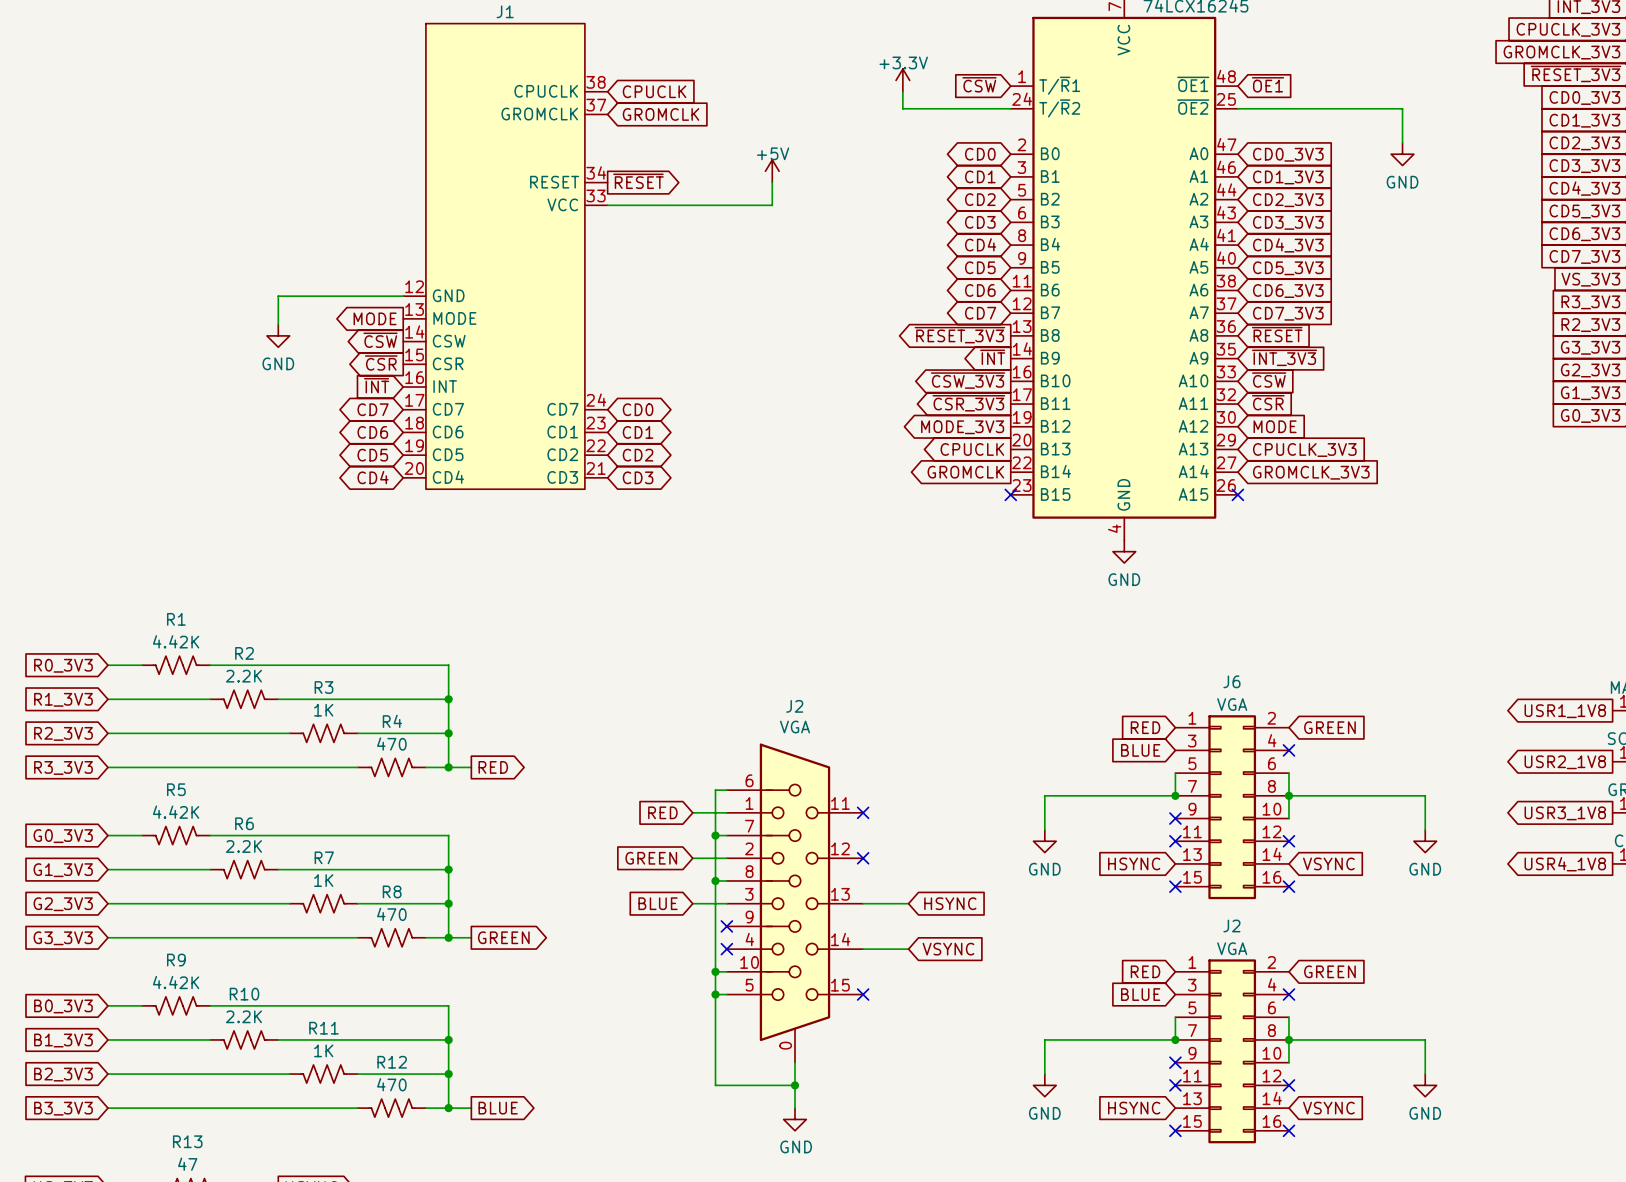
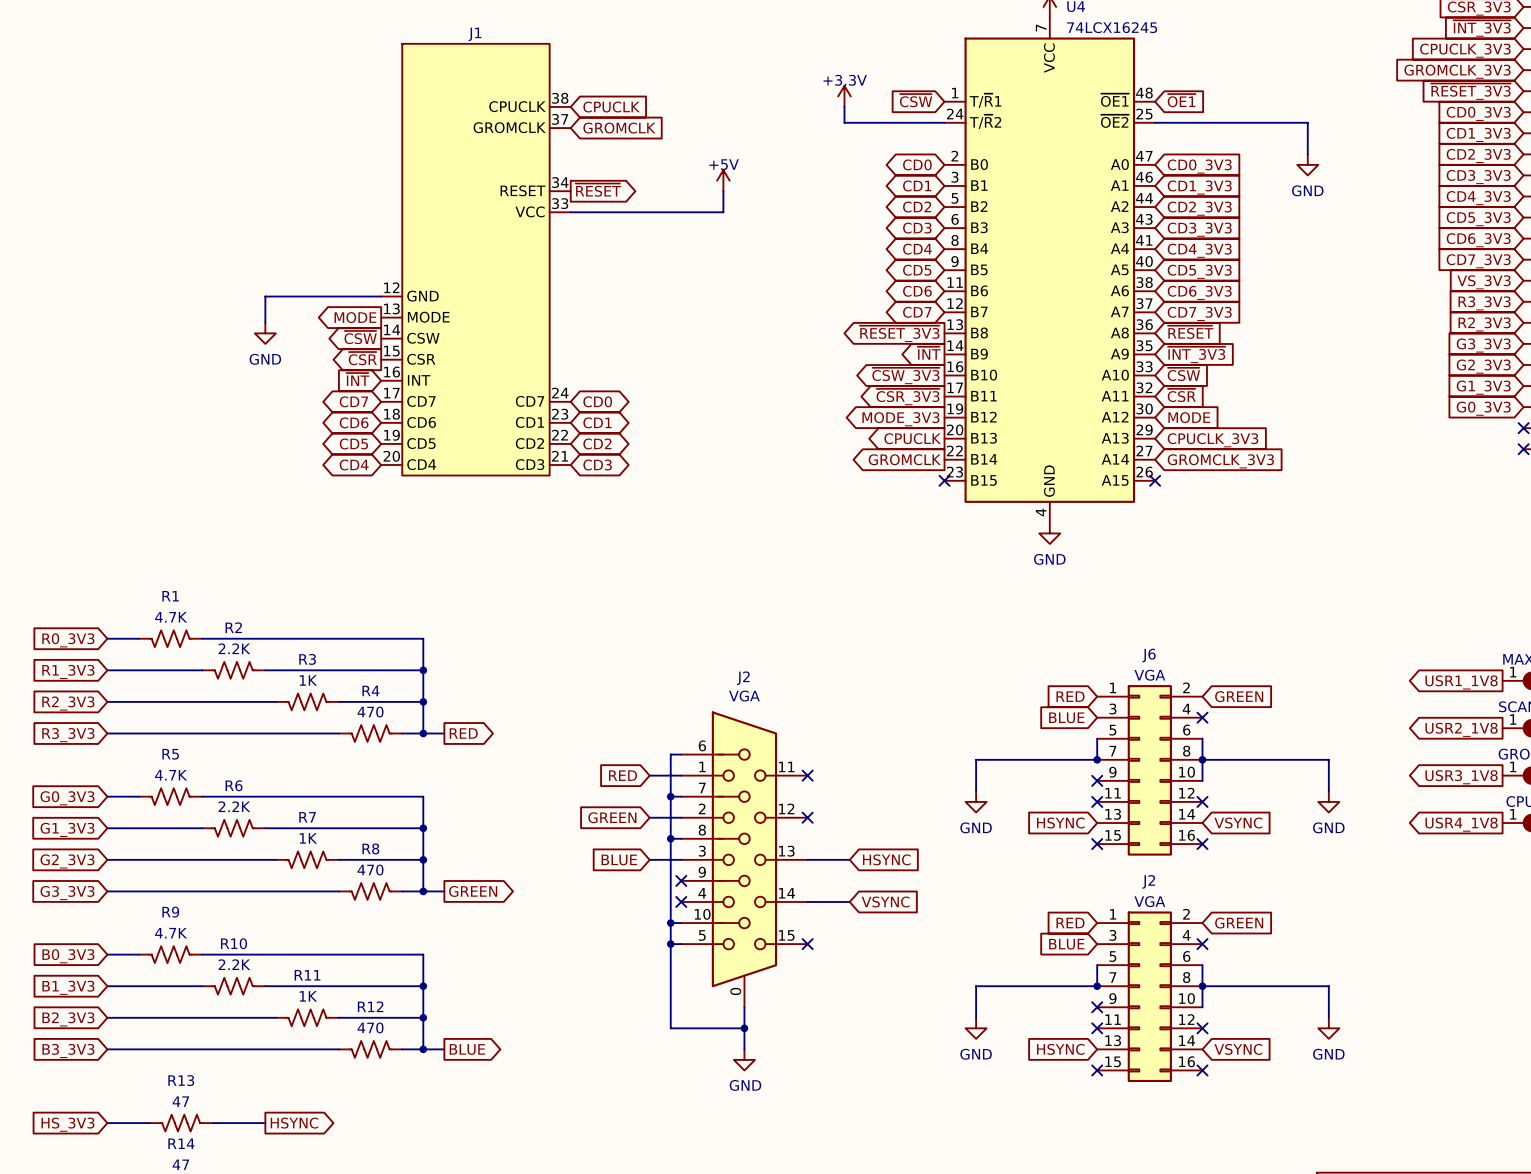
R1 value: 4.42K (176, 641) -> 4.7K (171, 617)
R5 value: 4.42K (176, 812) -> 4.7K (171, 775)
R9 value: 4.42K (176, 982) -> 4.7K (171, 933)

